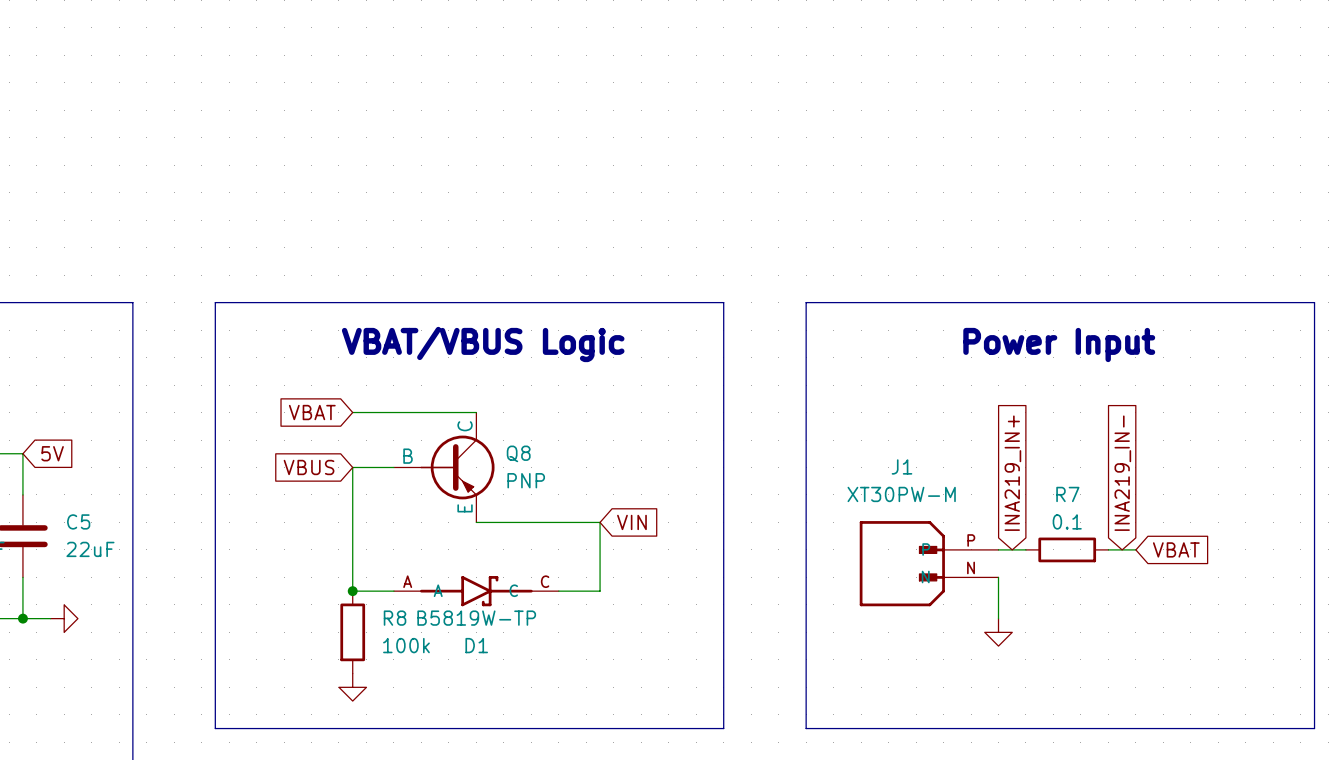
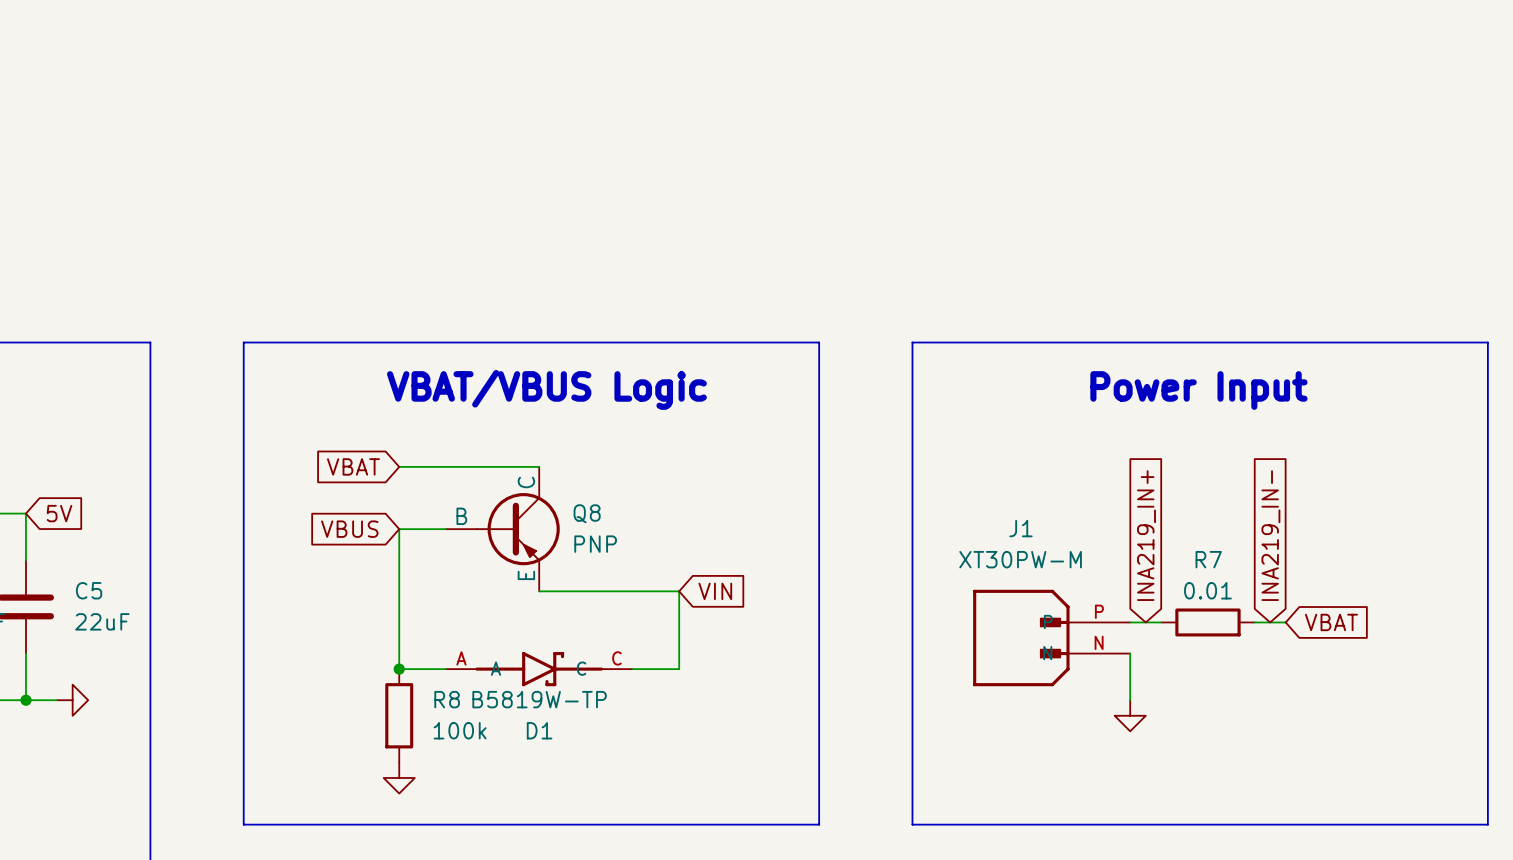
R7 value: 0.1 (1067, 521) -> 0.01 (1207, 590)

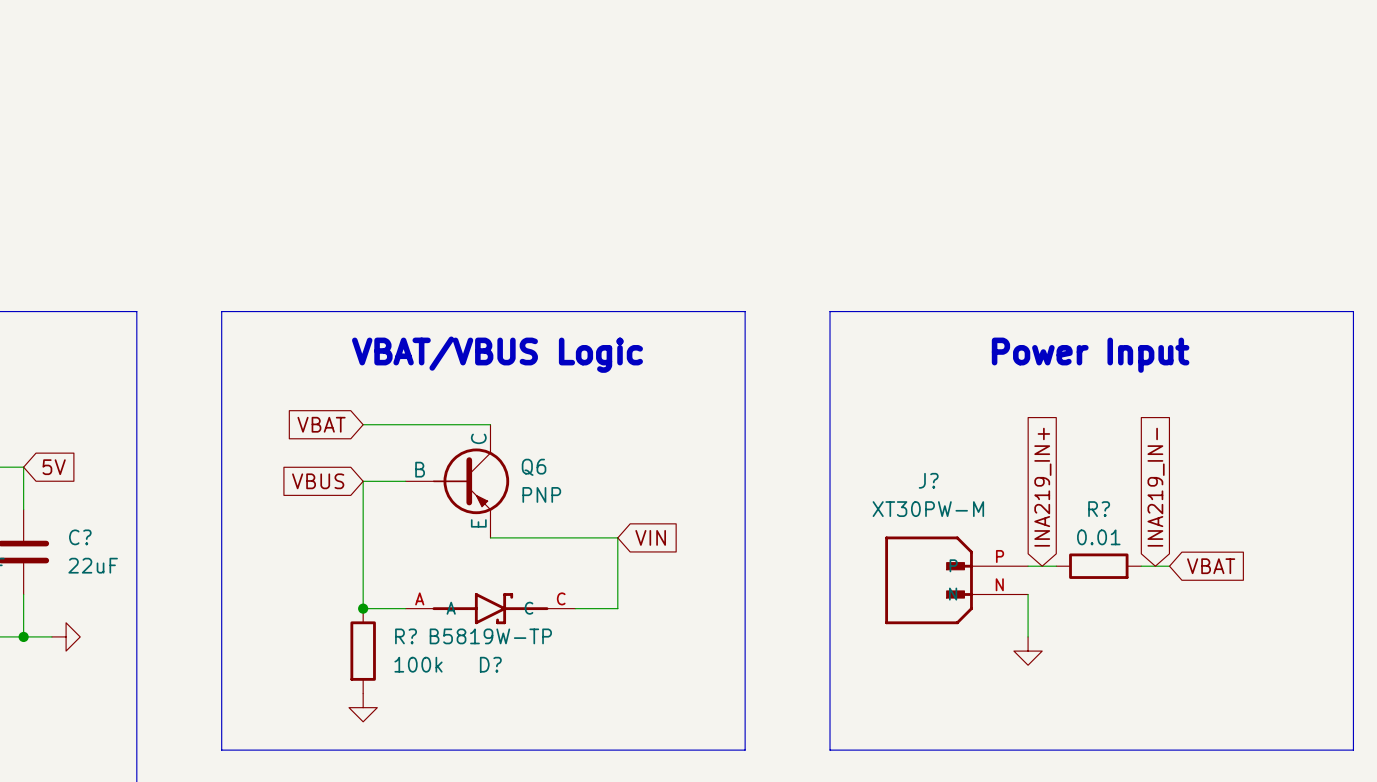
Q8 name: Q8 (587, 513) -> Q6 (534, 467)
J1 name: J1 (1020, 528) -> J? (928, 480)
R7 name: R7 (1208, 559) -> R? (1099, 509)
C5 name: C5 (89, 590) -> C? (80, 537)
R8 name: R8 (447, 699) -> R? (406, 636)
D1 name: D1 (539, 730) -> D? (490, 664)

